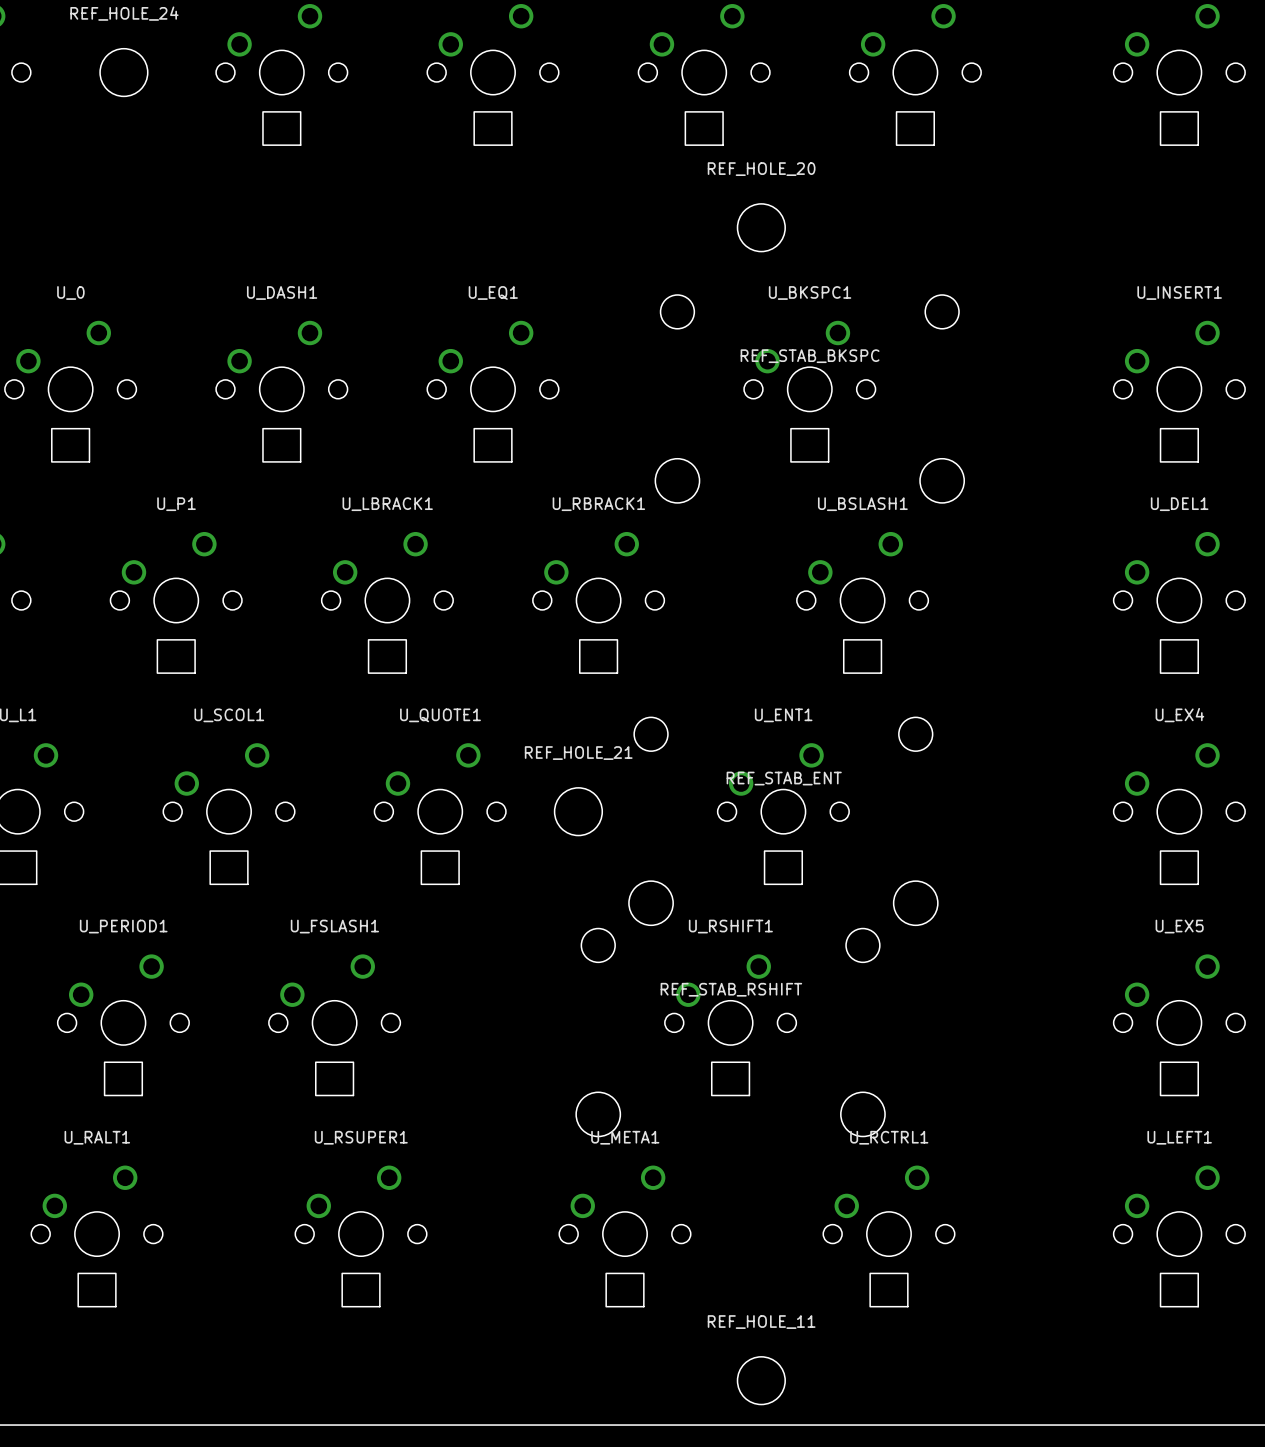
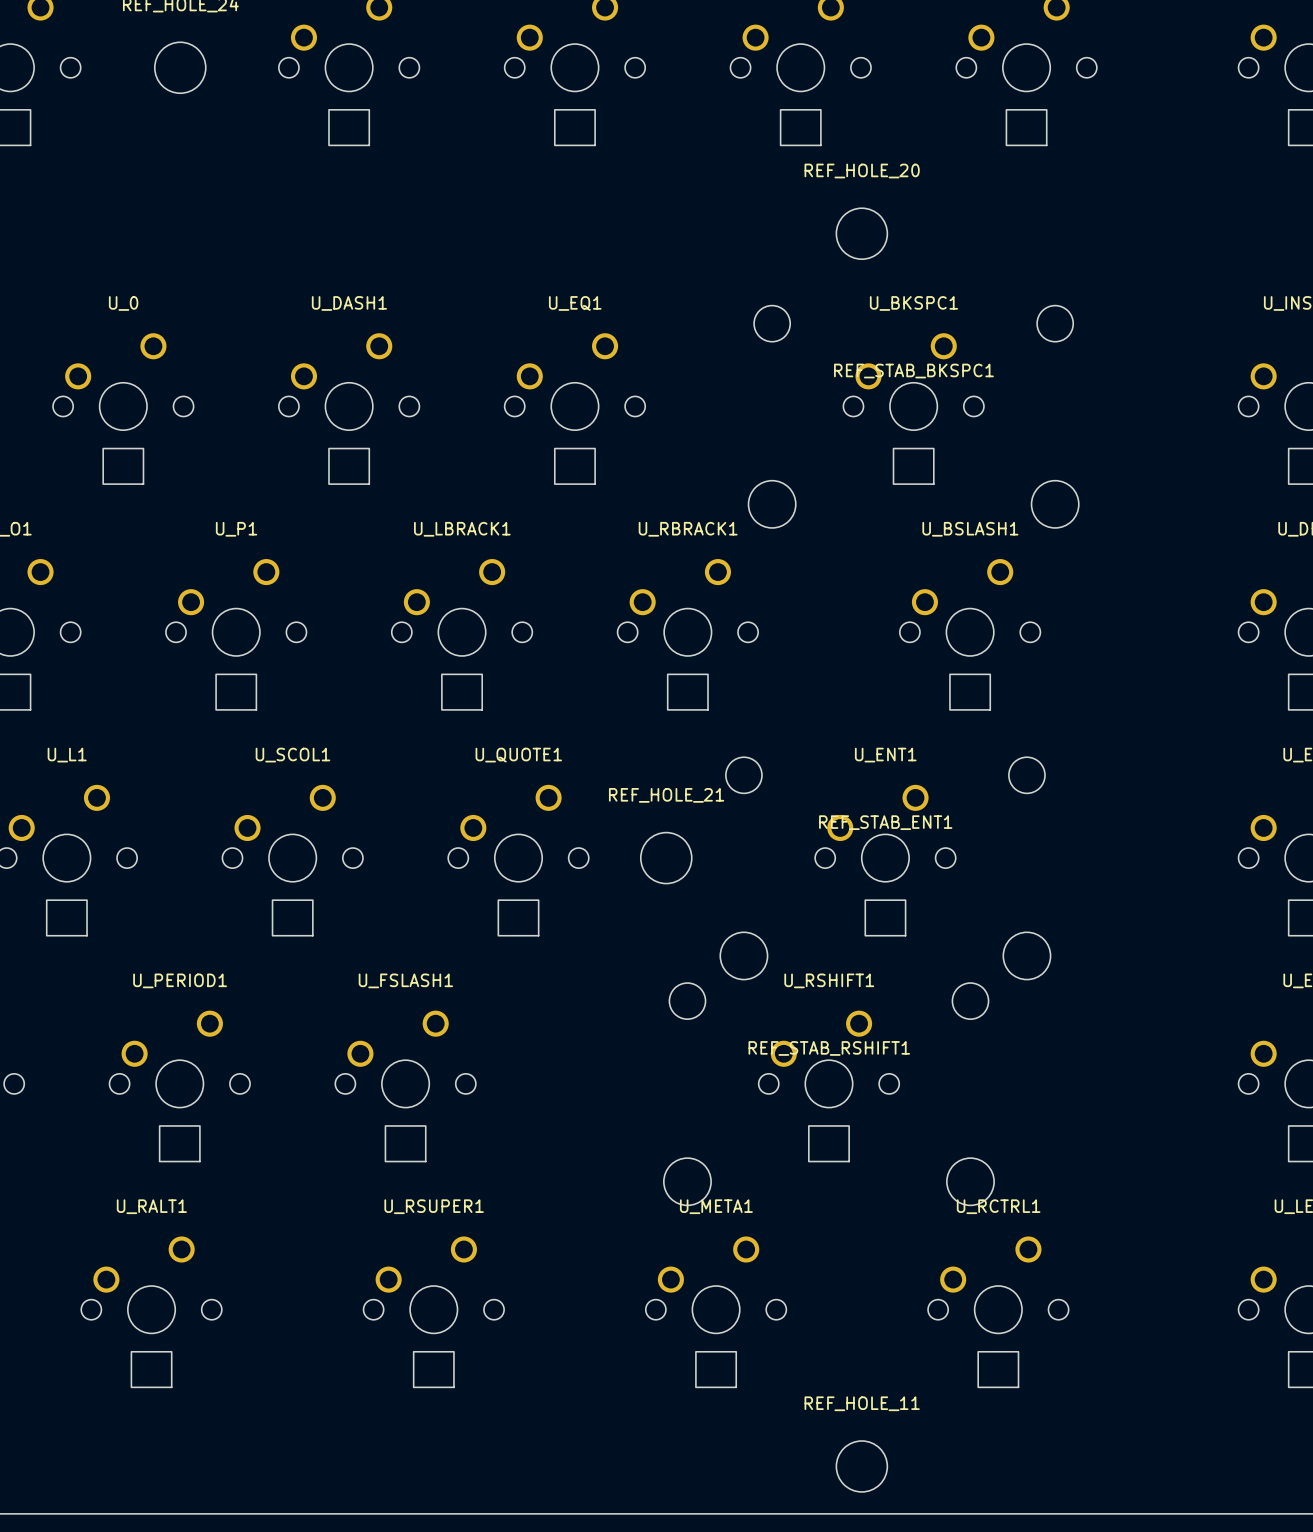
REF_STAB_BKSPC name: REF_STAB_BKSPC (810, 356) -> REF_STAB_BKSPC1 (913, 371)
REF_STAB_ENT name: REF_STAB_ENT (784, 778) -> REF_STAB_ENT1 (885, 822)
REF_STAB_RSHIFT name: REF_STAB_RSHIFT (731, 989) -> REF_STAB_RSHIFT1 (829, 1048)

